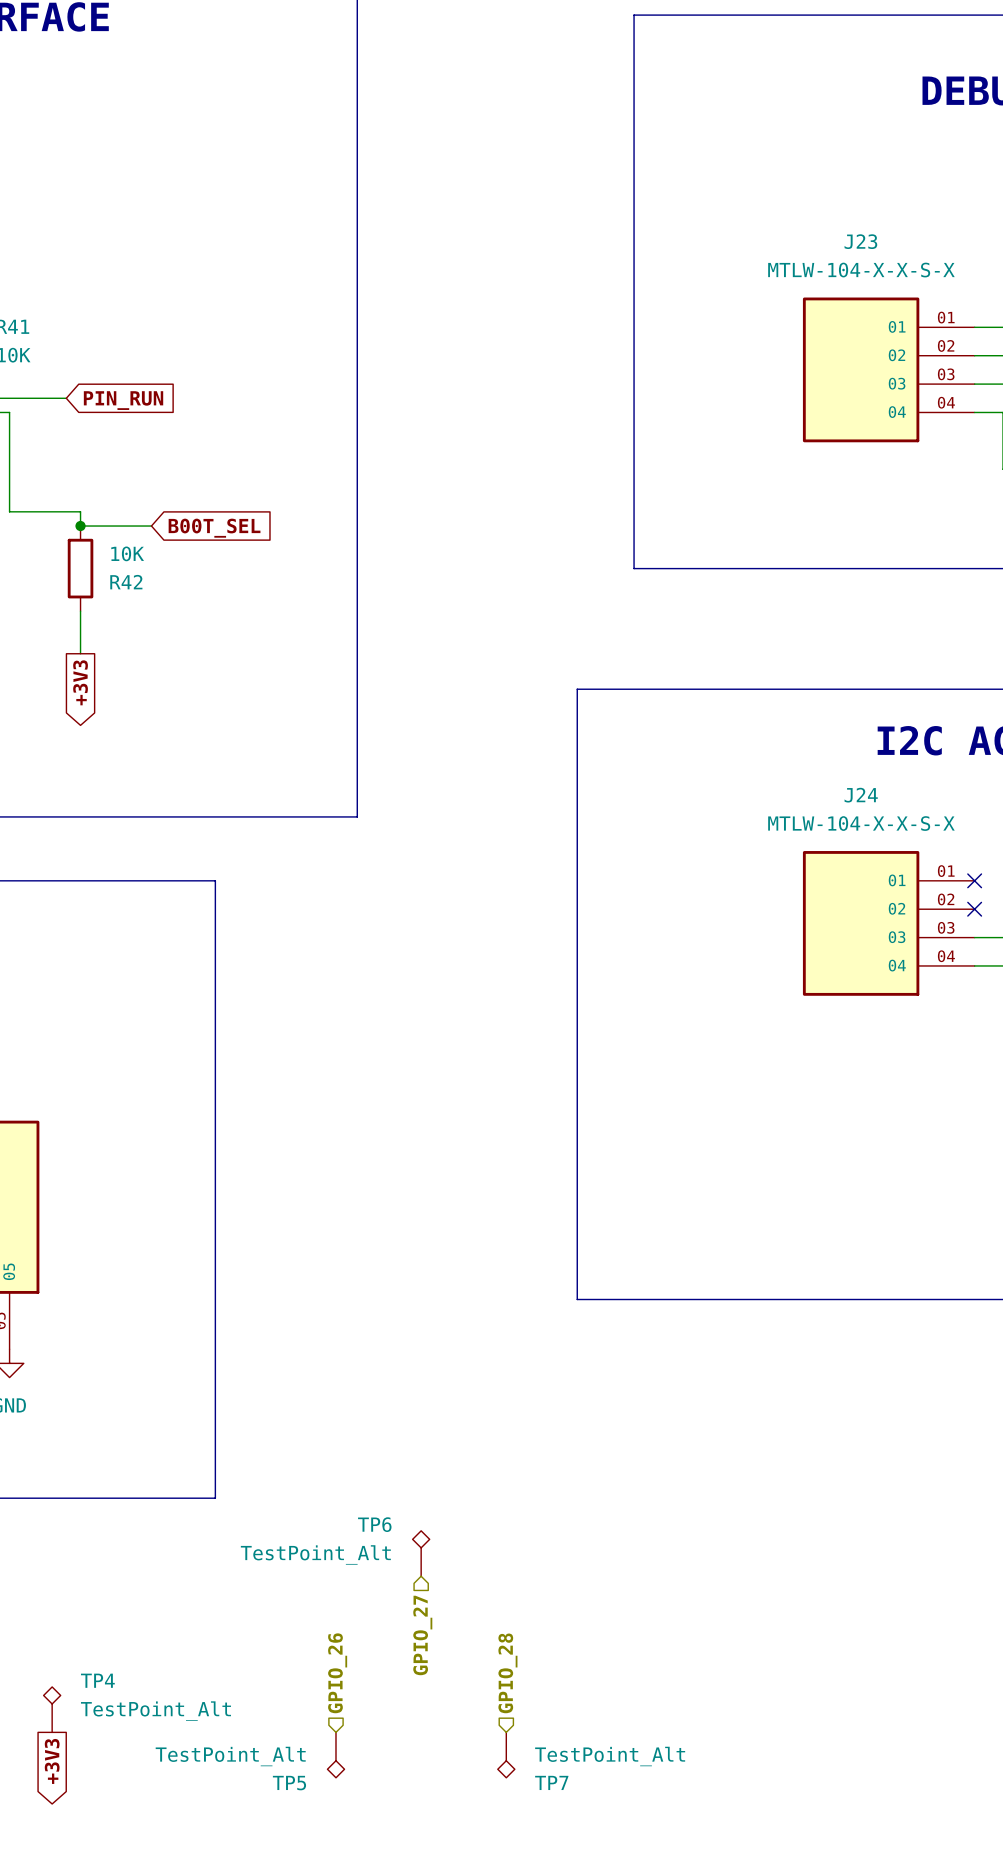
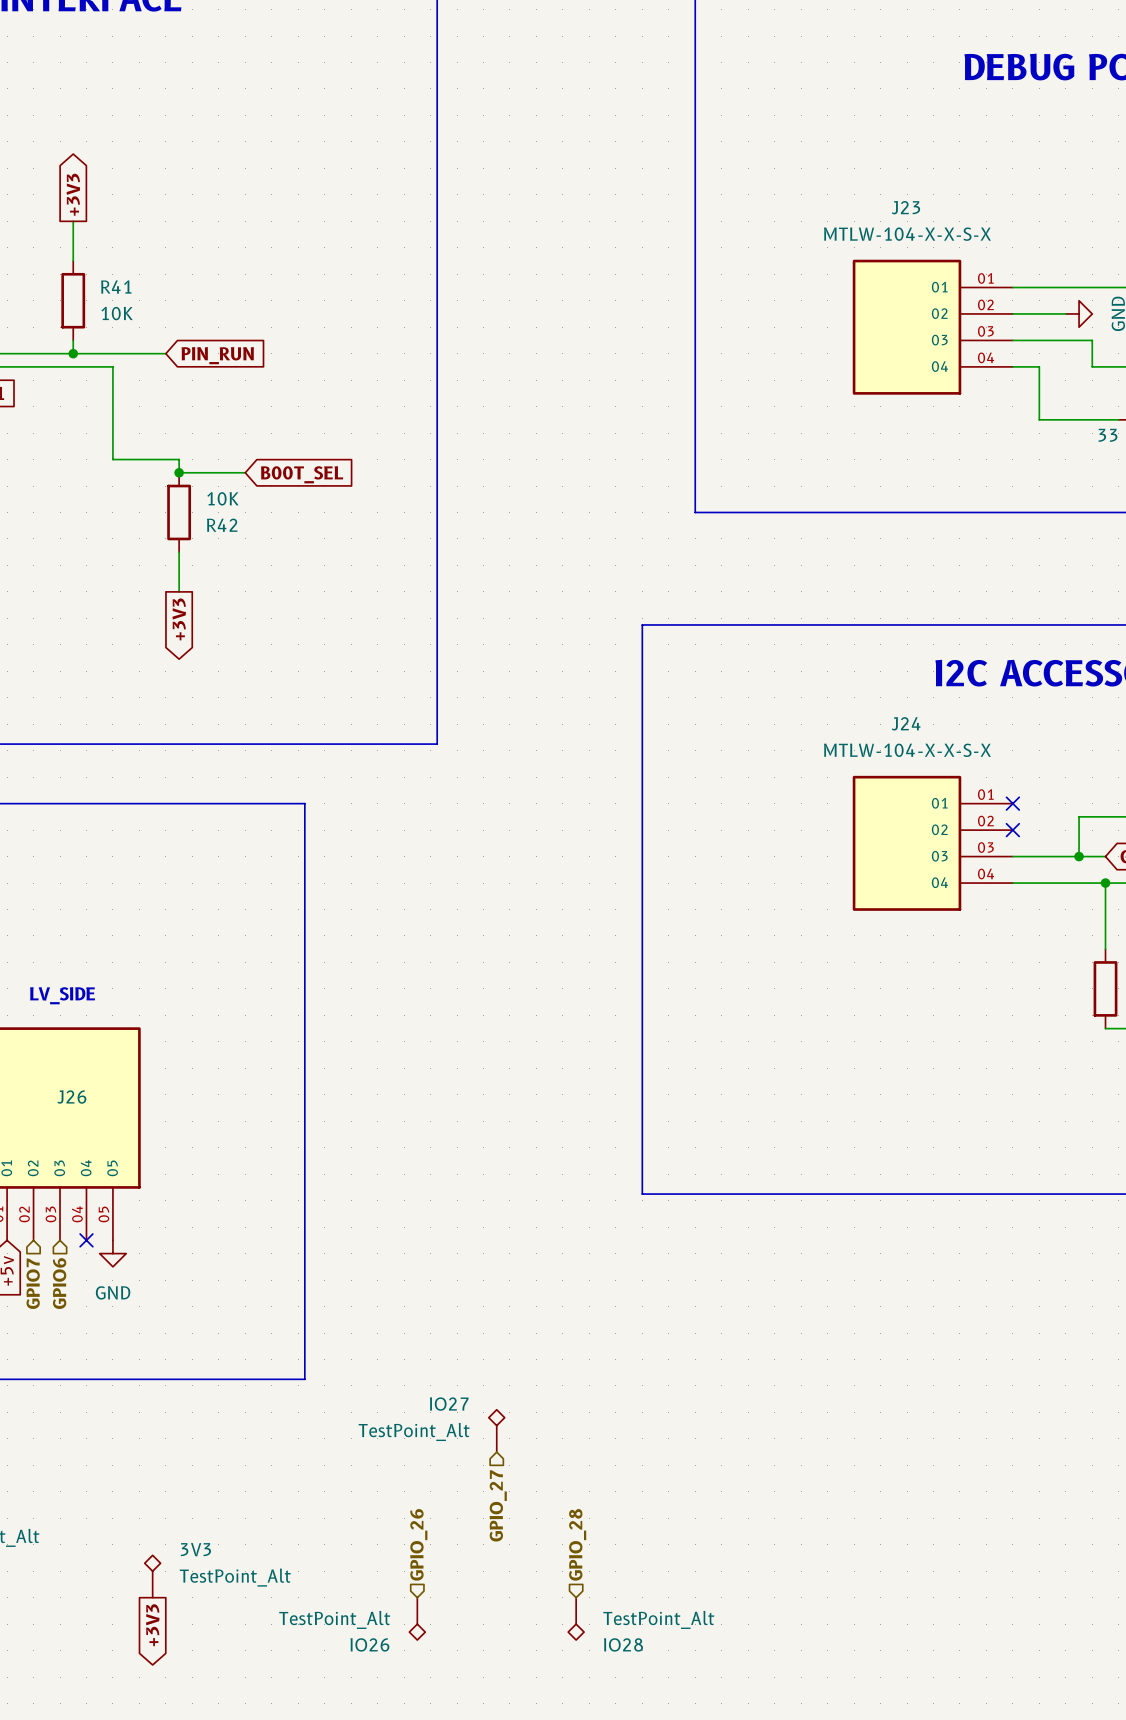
TP6 name: TP6 (374, 1524) -> IO27 (449, 1404)
TP4 name: TP4 (97, 1680) -> 3V3 (195, 1549)
TP7 name: TP7 (551, 1782) -> IO28 (623, 1644)
TP5 name: TP5 (289, 1783) -> IO26 (369, 1644)

